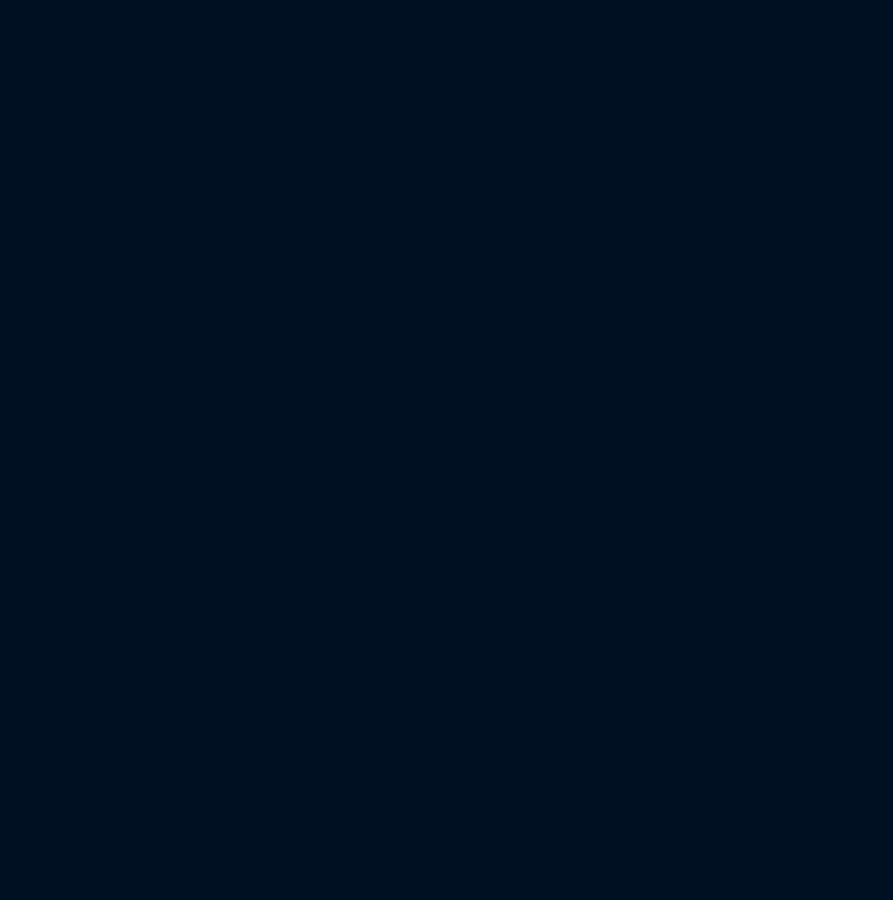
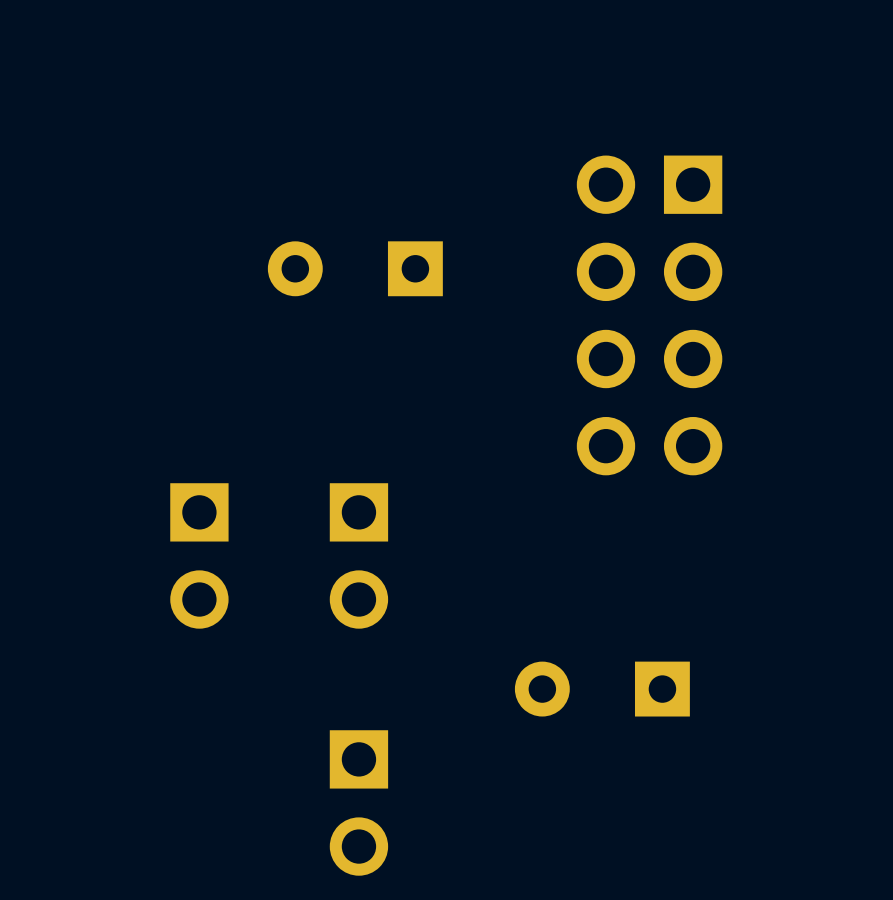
part: none -> (355, 268)
part: none -> (649, 315)
part: none -> (199, 555)
part: none -> (358, 555)
part: none -> (602, 689)
part: none -> (358, 802)

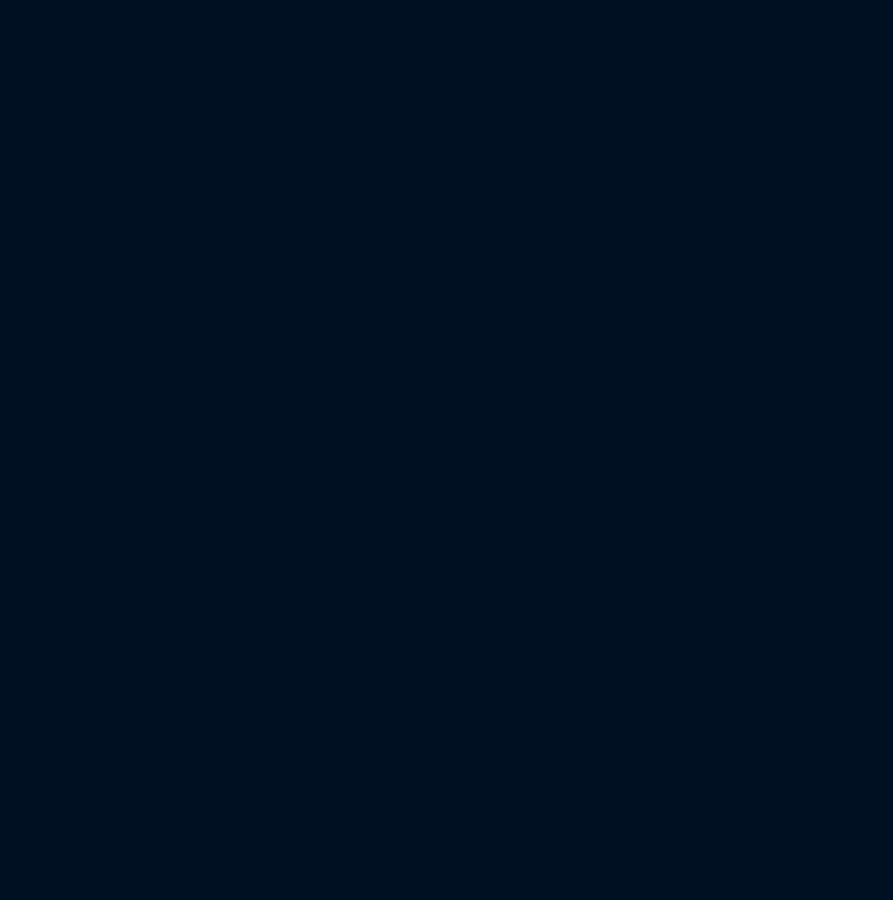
part: (355, 268) -> none
part: (649, 315) -> none
part: (199, 555) -> none
part: (358, 555) -> none
part: (602, 689) -> none
part: (358, 802) -> none

